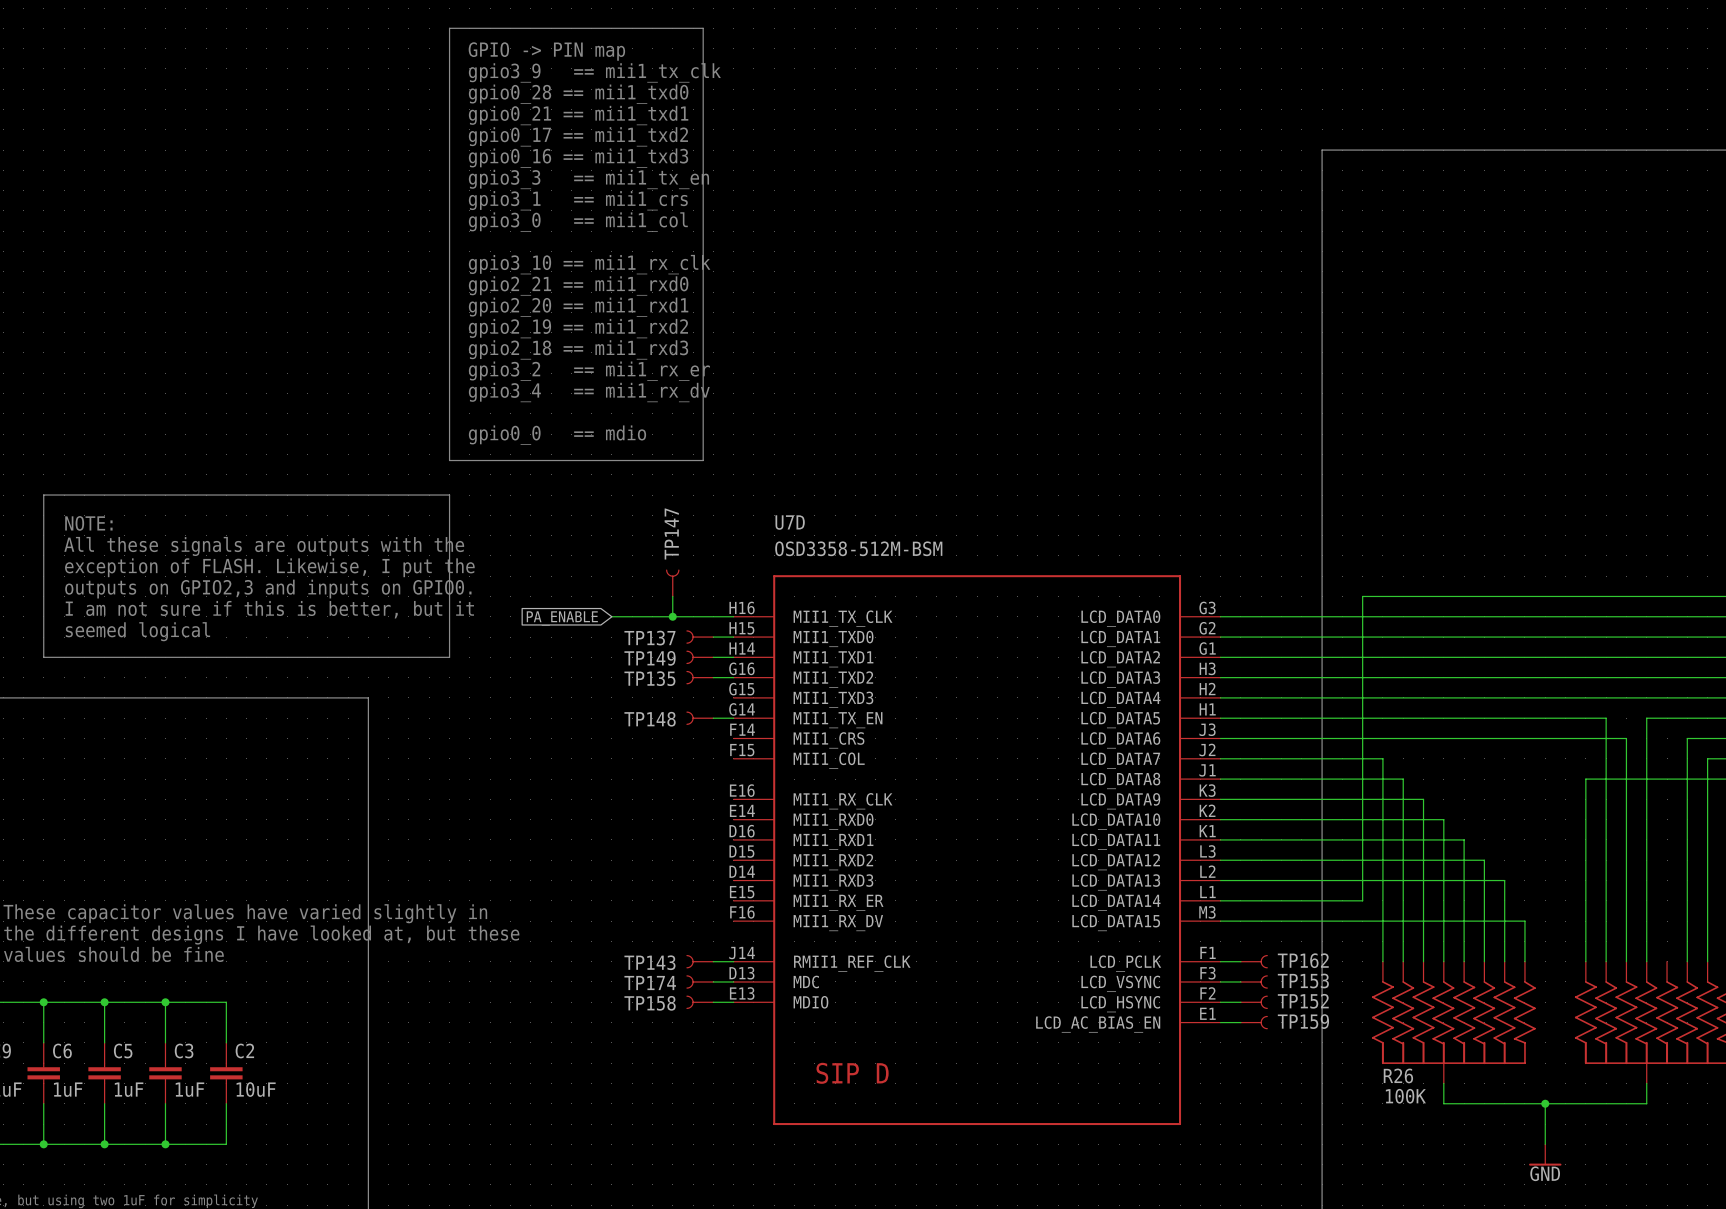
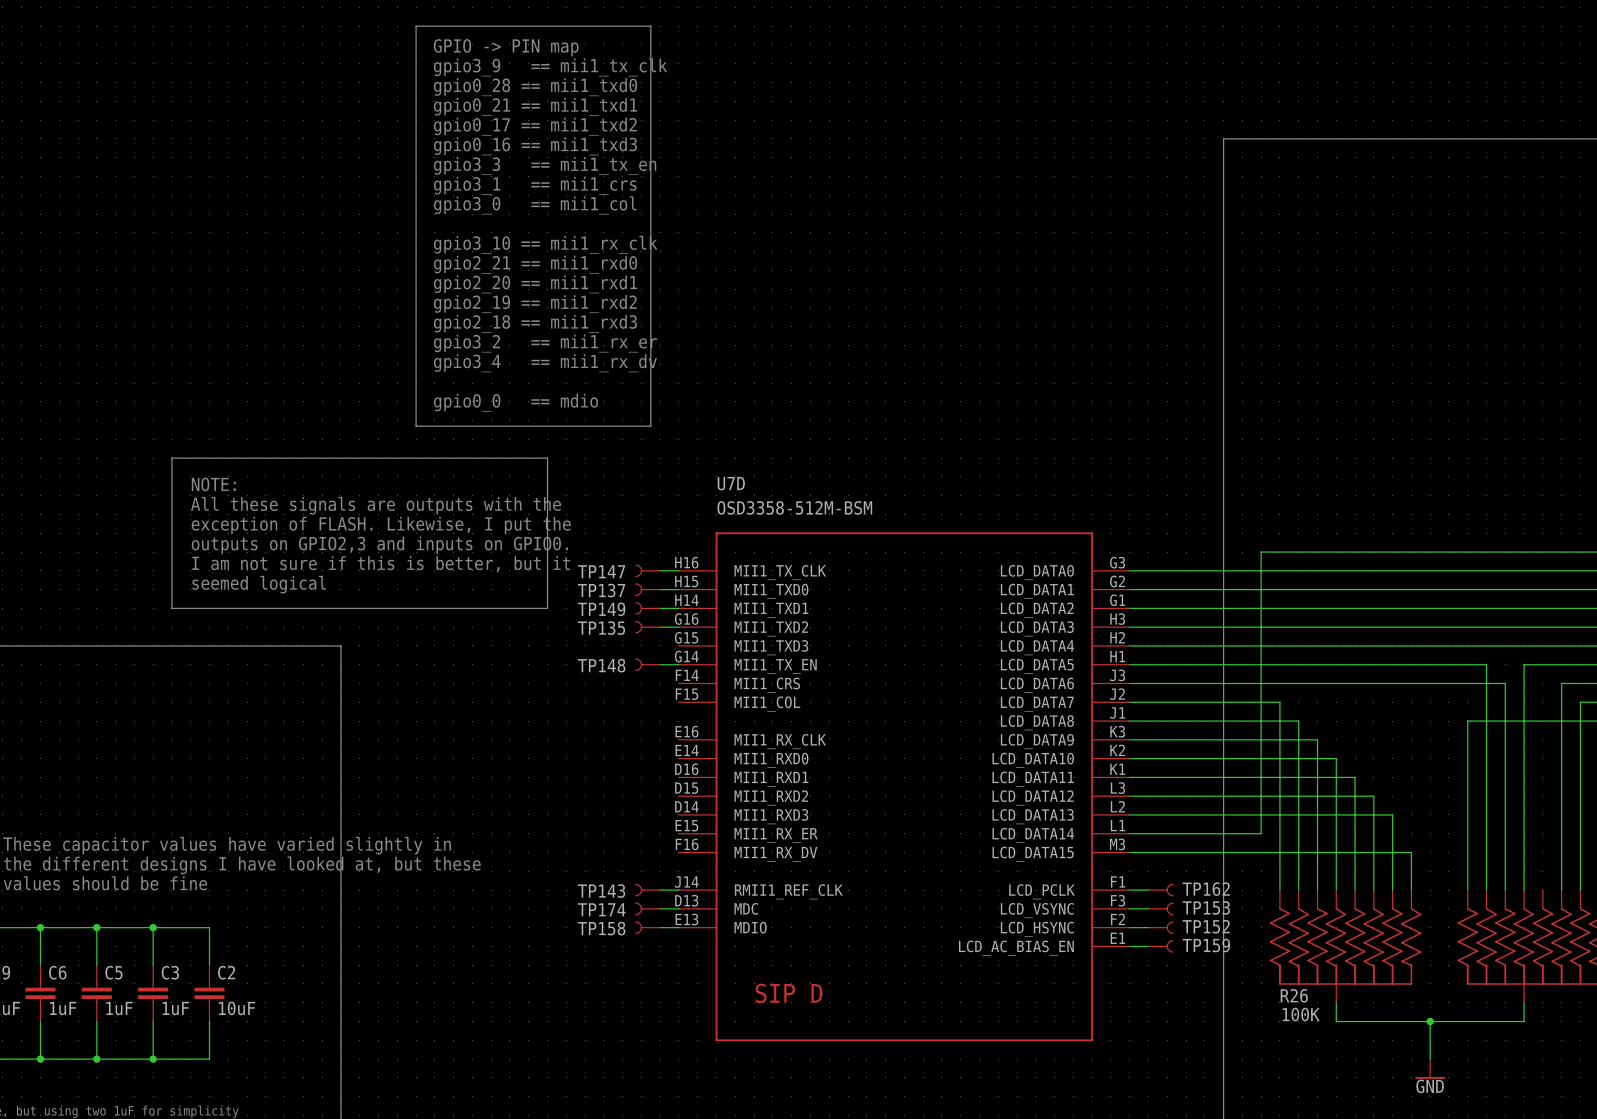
line: (185, 495) (43, 495) (43, 657) (185, 657) -> (171, 458) (171, 608)
line: (449, 495) (449, 657) -> (416, 458) (547, 458) (547, 608) (416, 608)
text position: NOTE: (88, 523) -> NOTE: (213, 484)
text position: All these signals are outputs with the (264, 546) -> All these signals are outputs with the (376, 505)
text position: exception of FLASH. Likewise, I put the (269, 567) -> exception of FLASH. Likewise, I put the (381, 525)
TP147 rotation: 0° (672, 583) -> 90° counterclockwise (648, 570)
TP147 position: (672, 583) -> (648, 570)
text position: outputs on GPIO2,3 and inputs on GPIO0. (268, 589) -> outputs on GPIO2,3 and inputs on GPIO0. (379, 545)
wire: (672, 596) (672, 616) -> none
text position: I am not sure if this is better, but it (269, 609) -> I am not sure if this is better, but it (381, 564)
wire: (611, 616) (713, 616) -> none
junction: (672, 616) -> none
global label: PA_ENABLE (562, 618) -> none
text position: seemed logical (137, 631) -> seemed logical (259, 584)

